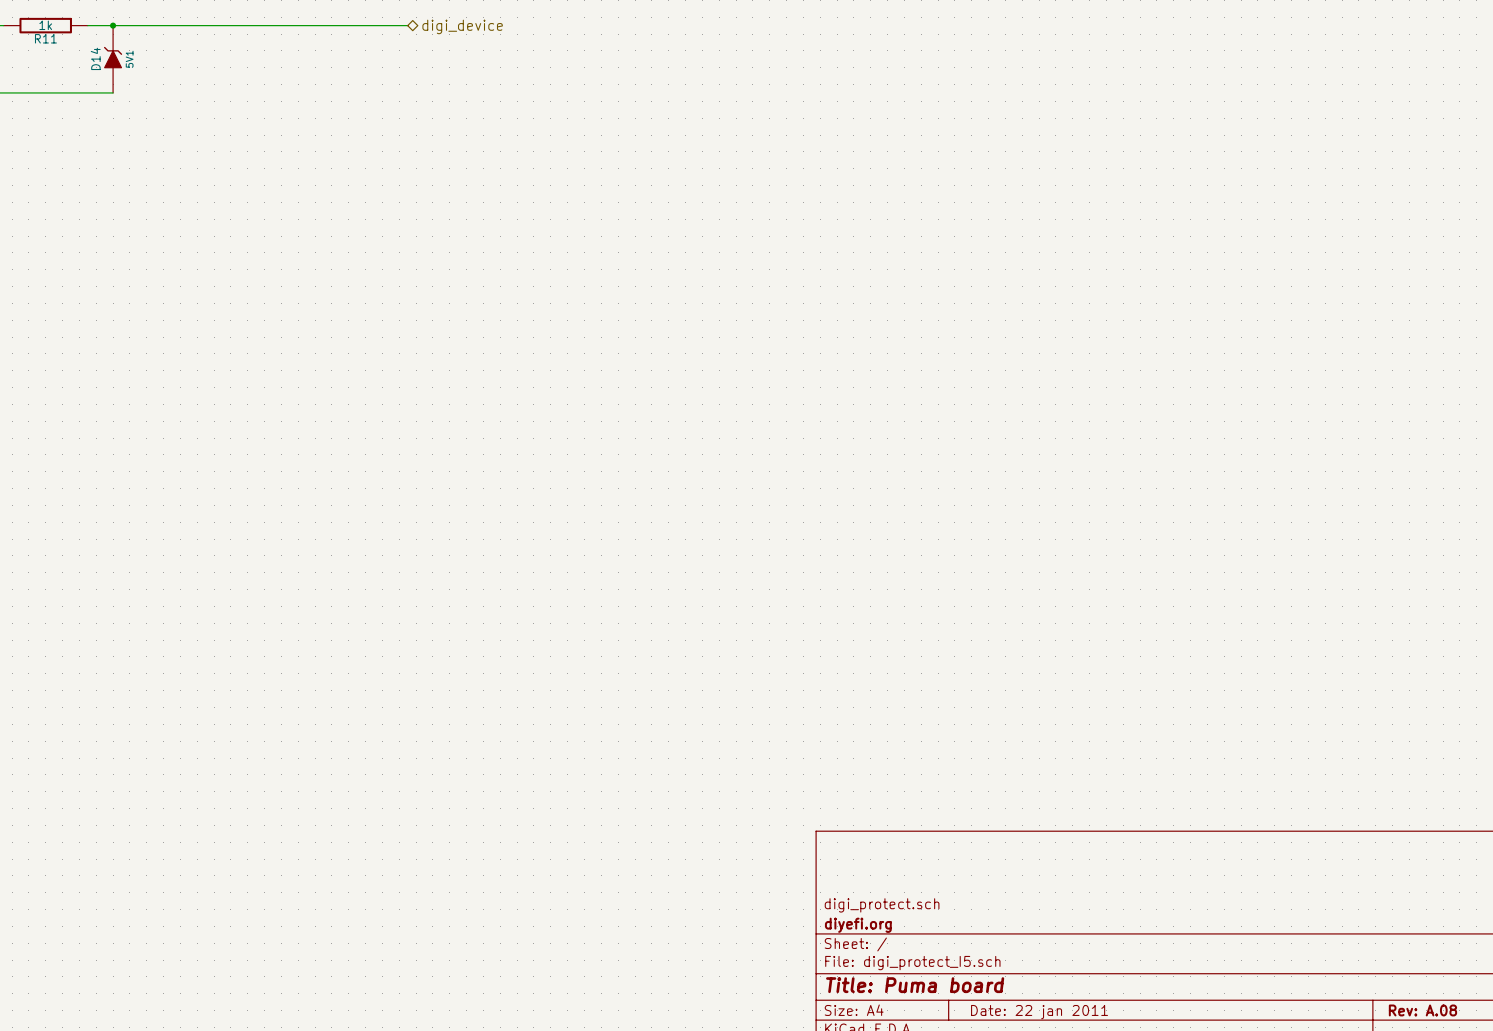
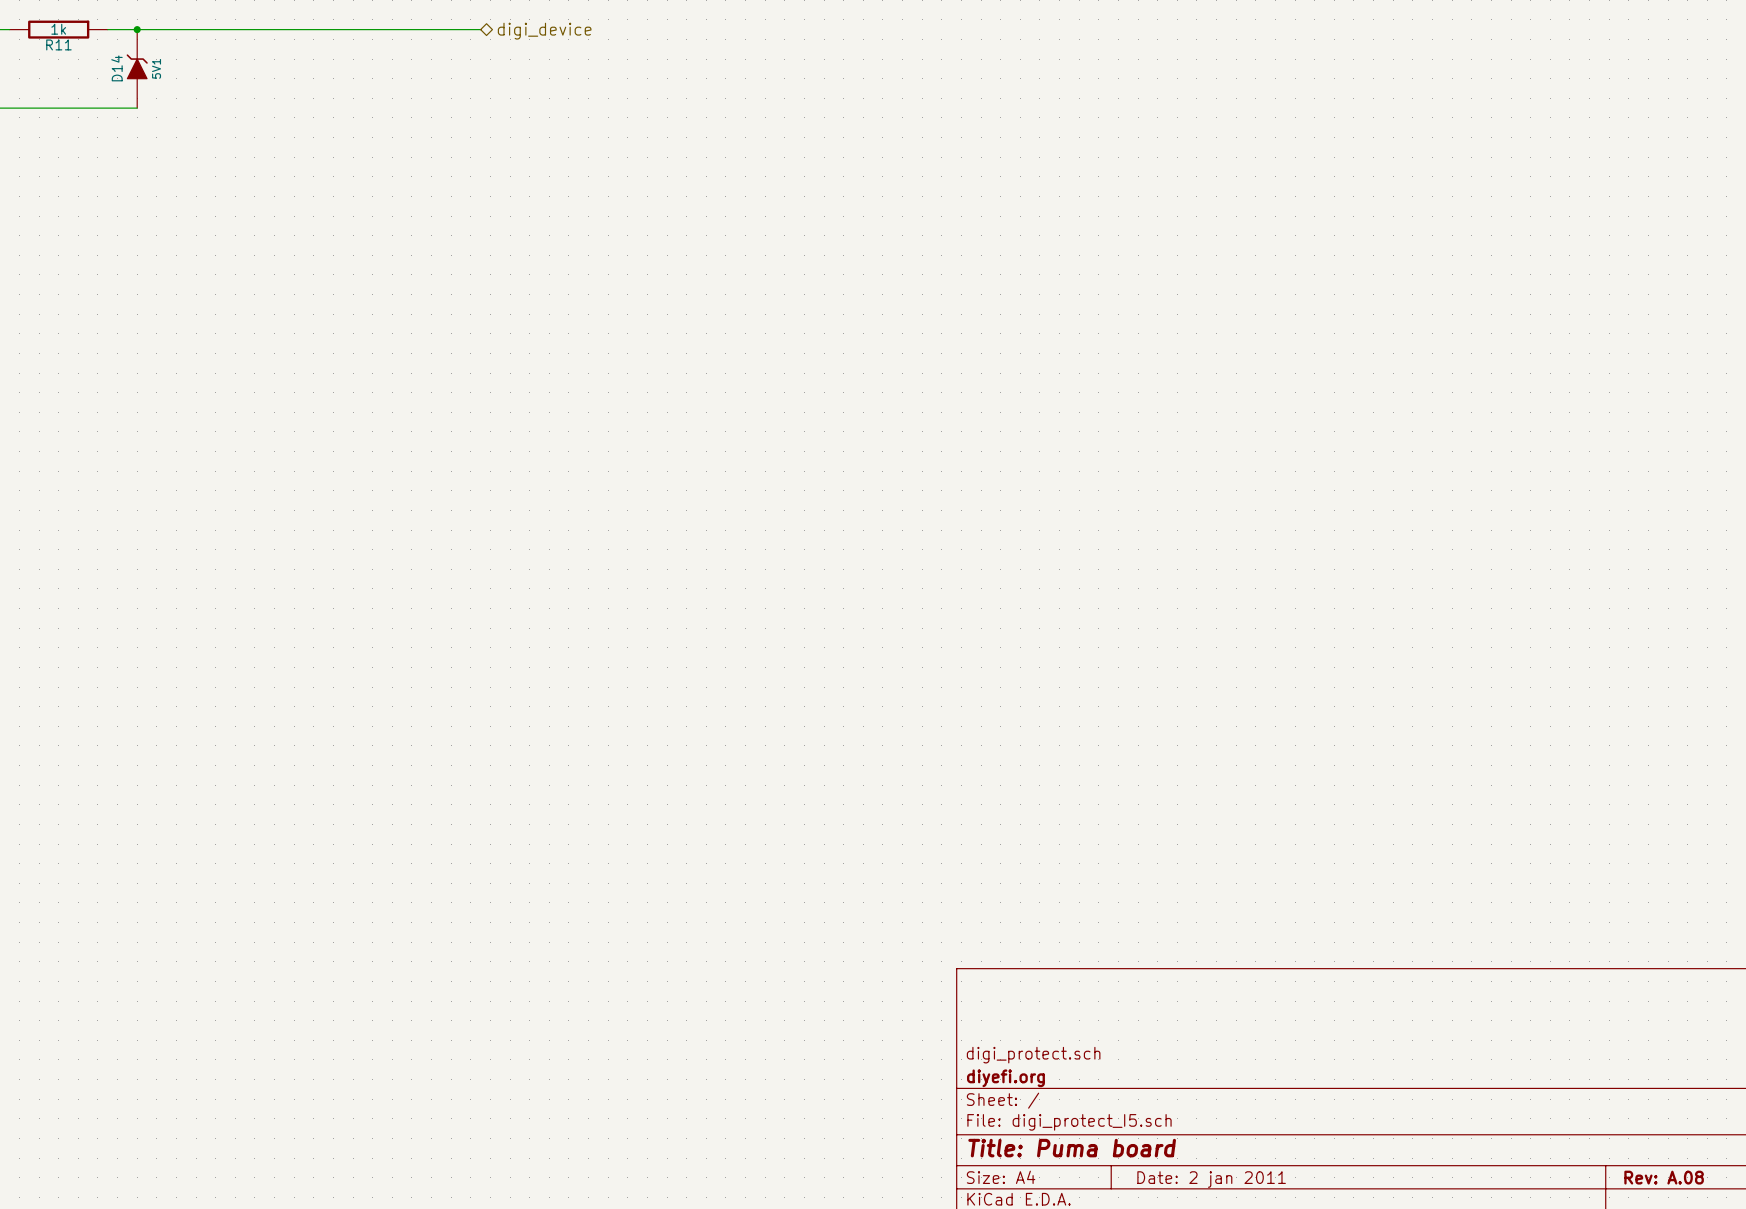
title block: Date: 22 jan 2011 (1039, 1012) -> Date: 2 jan 2011 (1211, 1179)

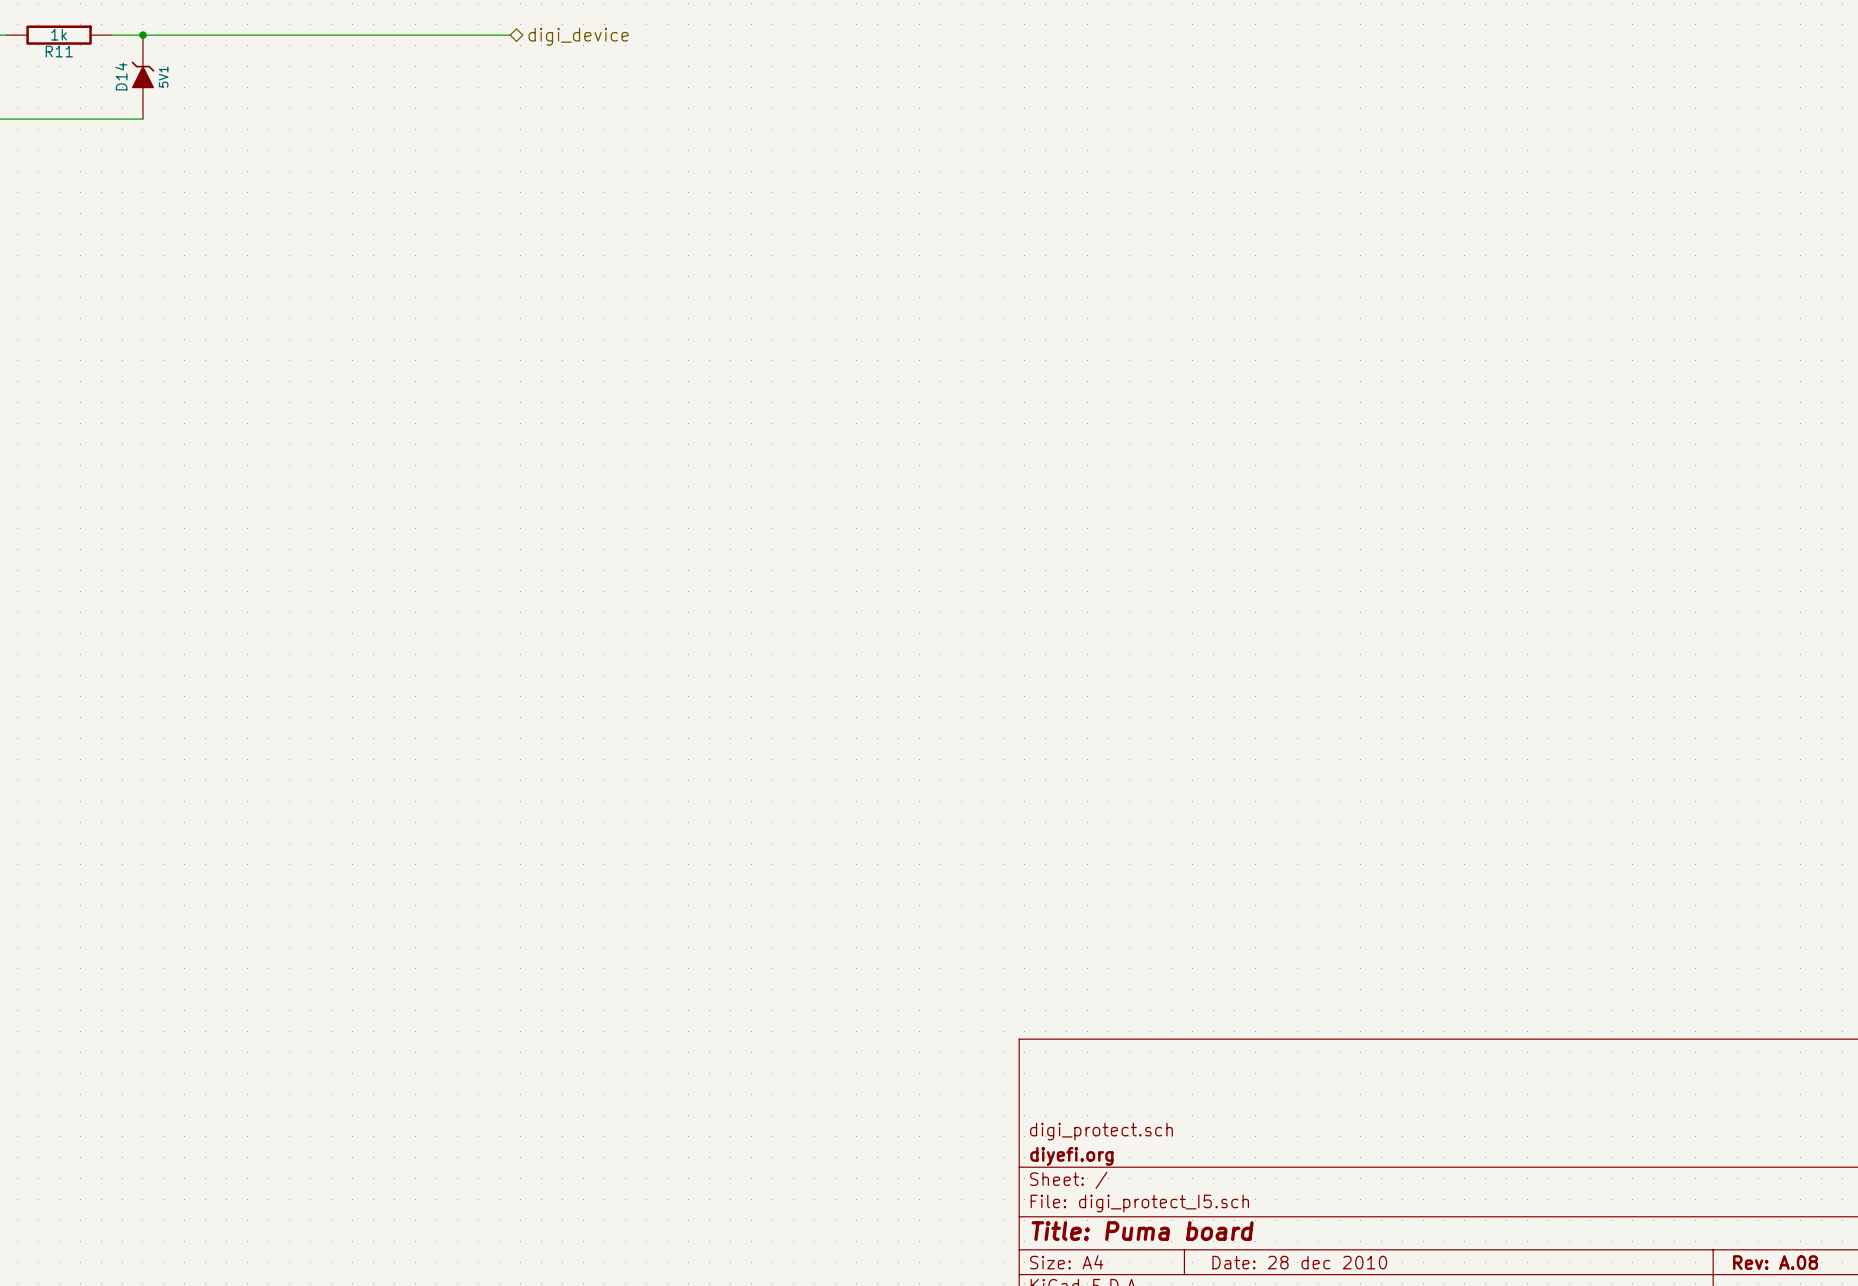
title block: Date: 2 jan 2011 (1211, 1179) -> Date: 28 dec 2010 (1299, 1262)

